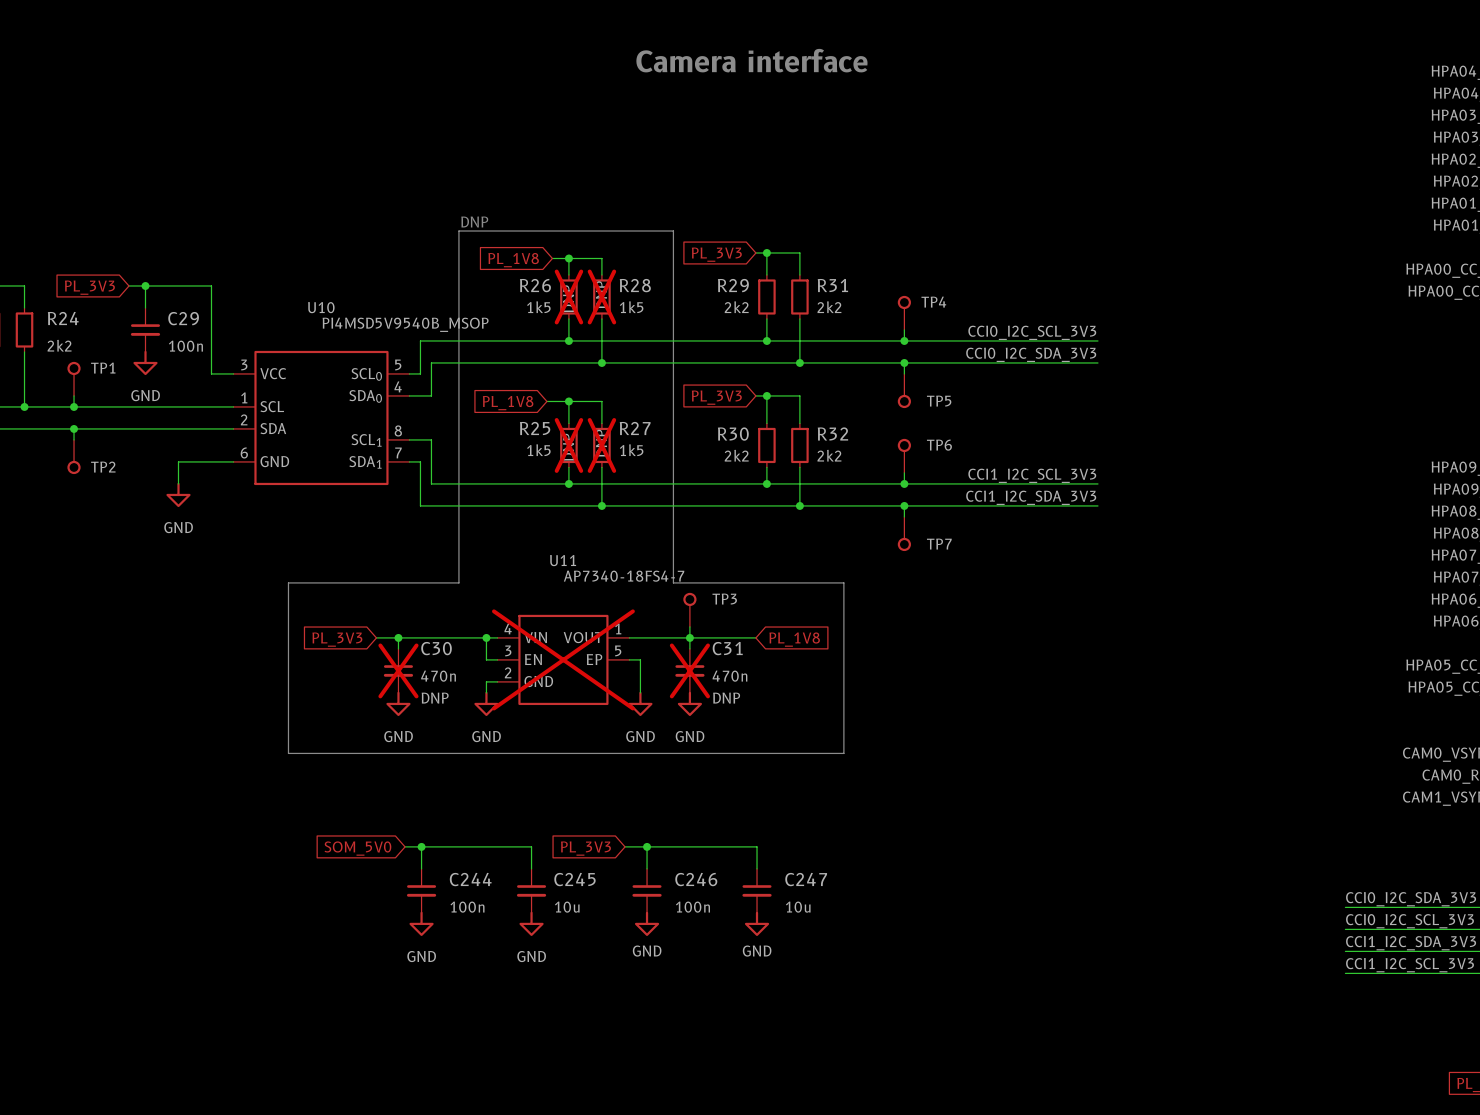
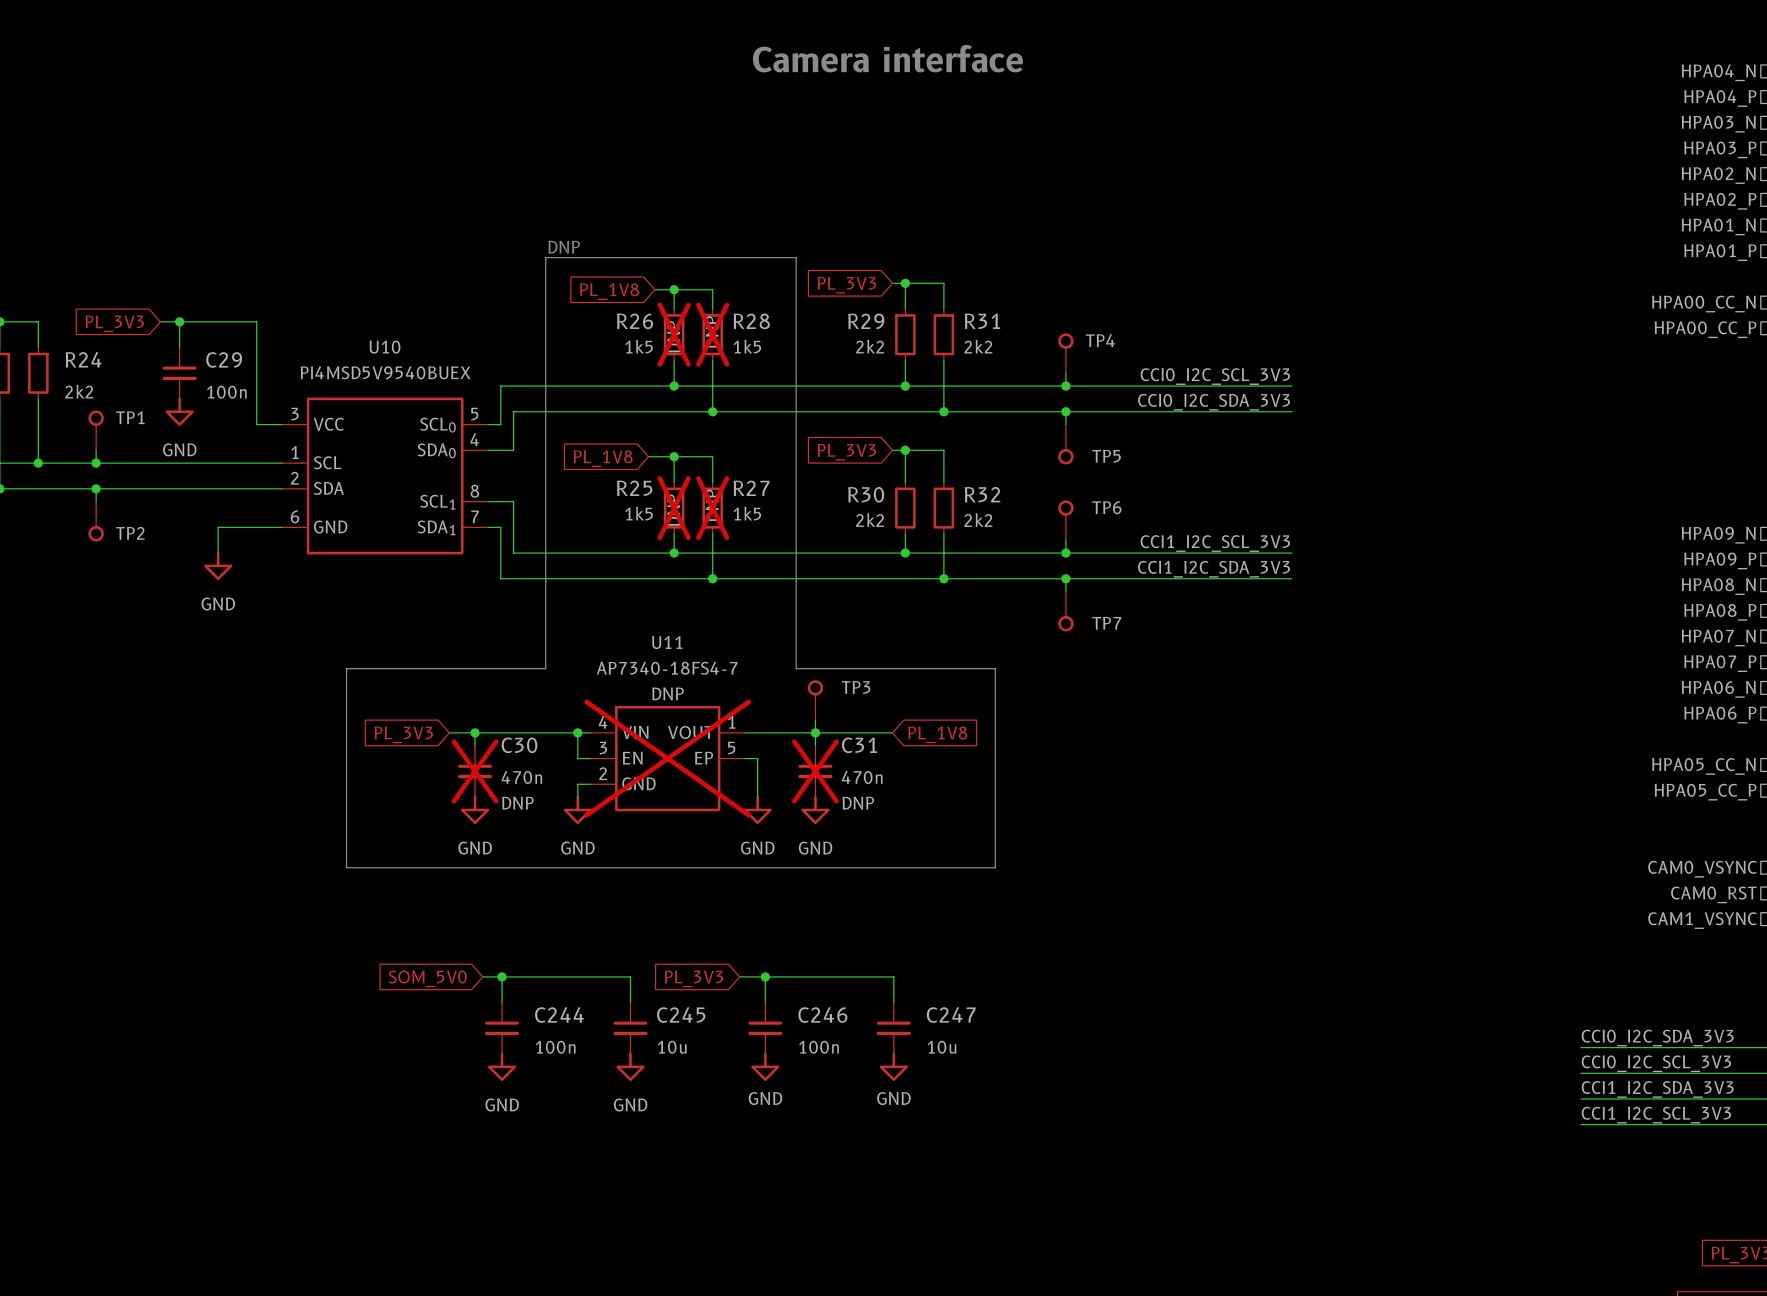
U10 value: PI4MSD5V9540B_MSOP (405, 324) -> none
U10 text: none -> PI4MSD5V9540BUEX (385, 372)
U11 value position: AP7340-18FS4-7 (624, 576) -> AP7340-18FS4-7 (667, 668)
U11 text: none -> DNP (667, 693)

